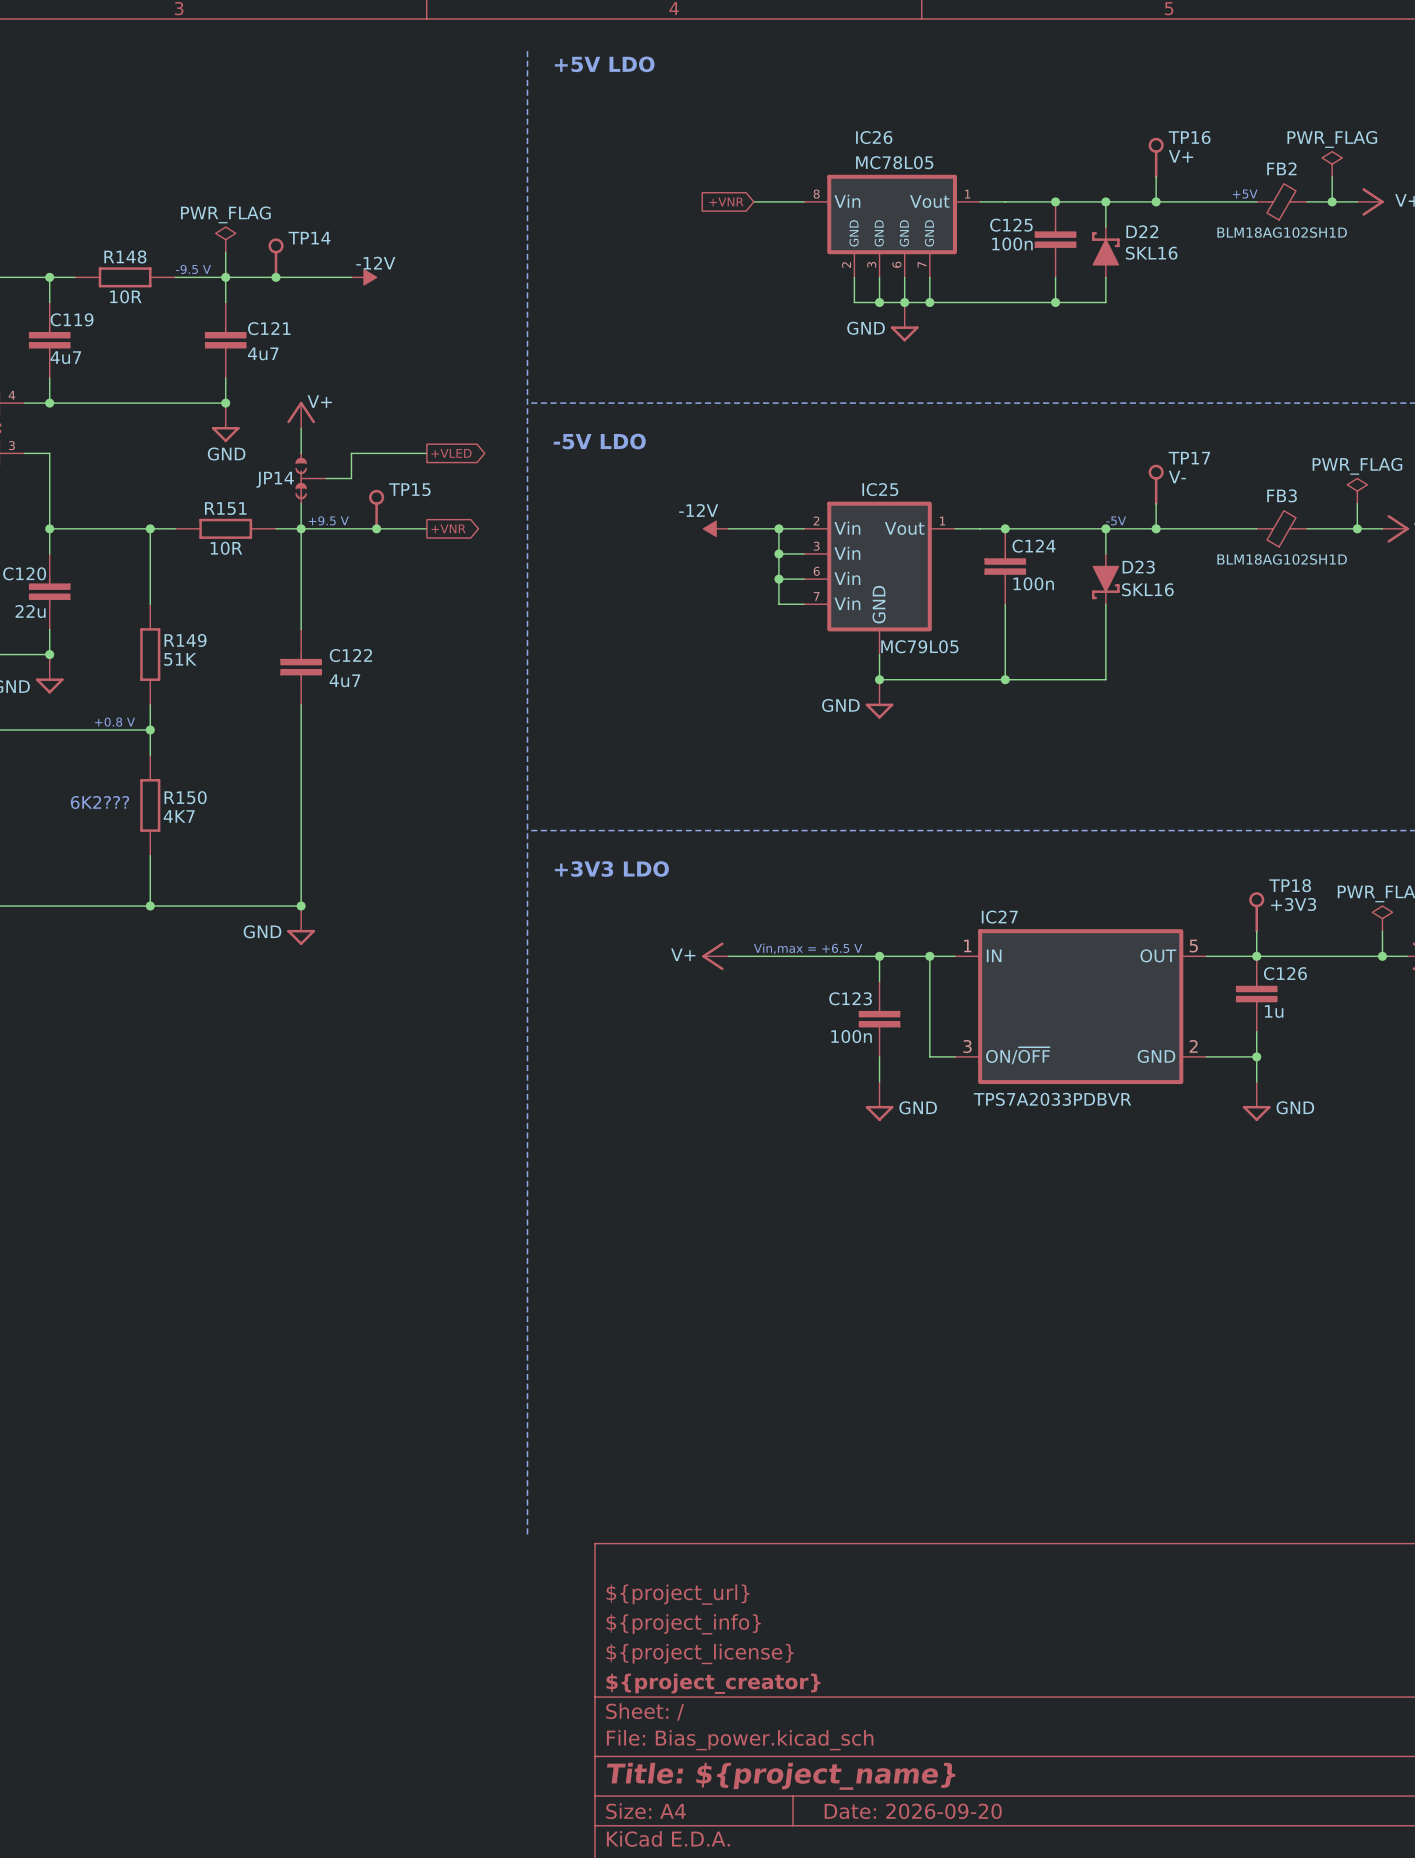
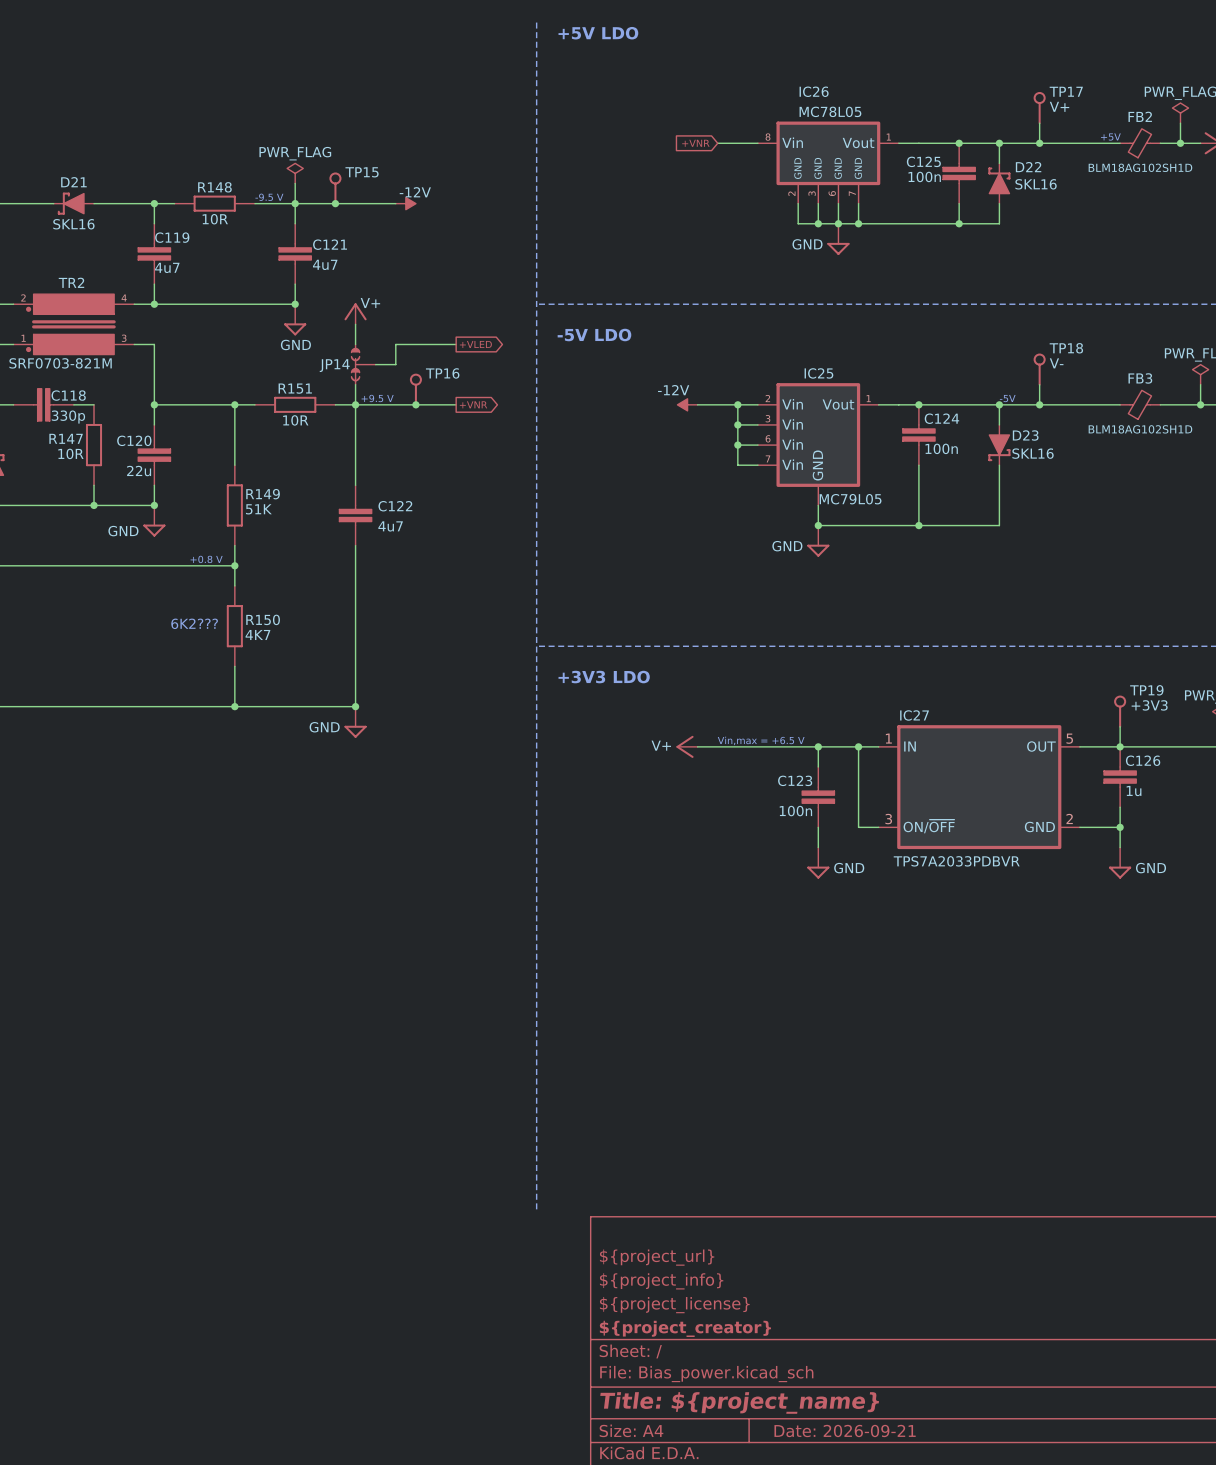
TP16 name: TP16 (1189, 137) -> TP17 (1066, 91)
TP14 name: TP14 (309, 238) -> TP15 (362, 172)
TP17 name: TP17 (1189, 458) -> TP18 (1066, 348)
TP15 name: TP15 (409, 489) -> TP16 (442, 373)
TP18 name: TP18 (1290, 885) -> TP19 (1146, 690)
title block: Date: 2026-09-20 (913, 1811) -> Date: 2026-09-21 (845, 1430)

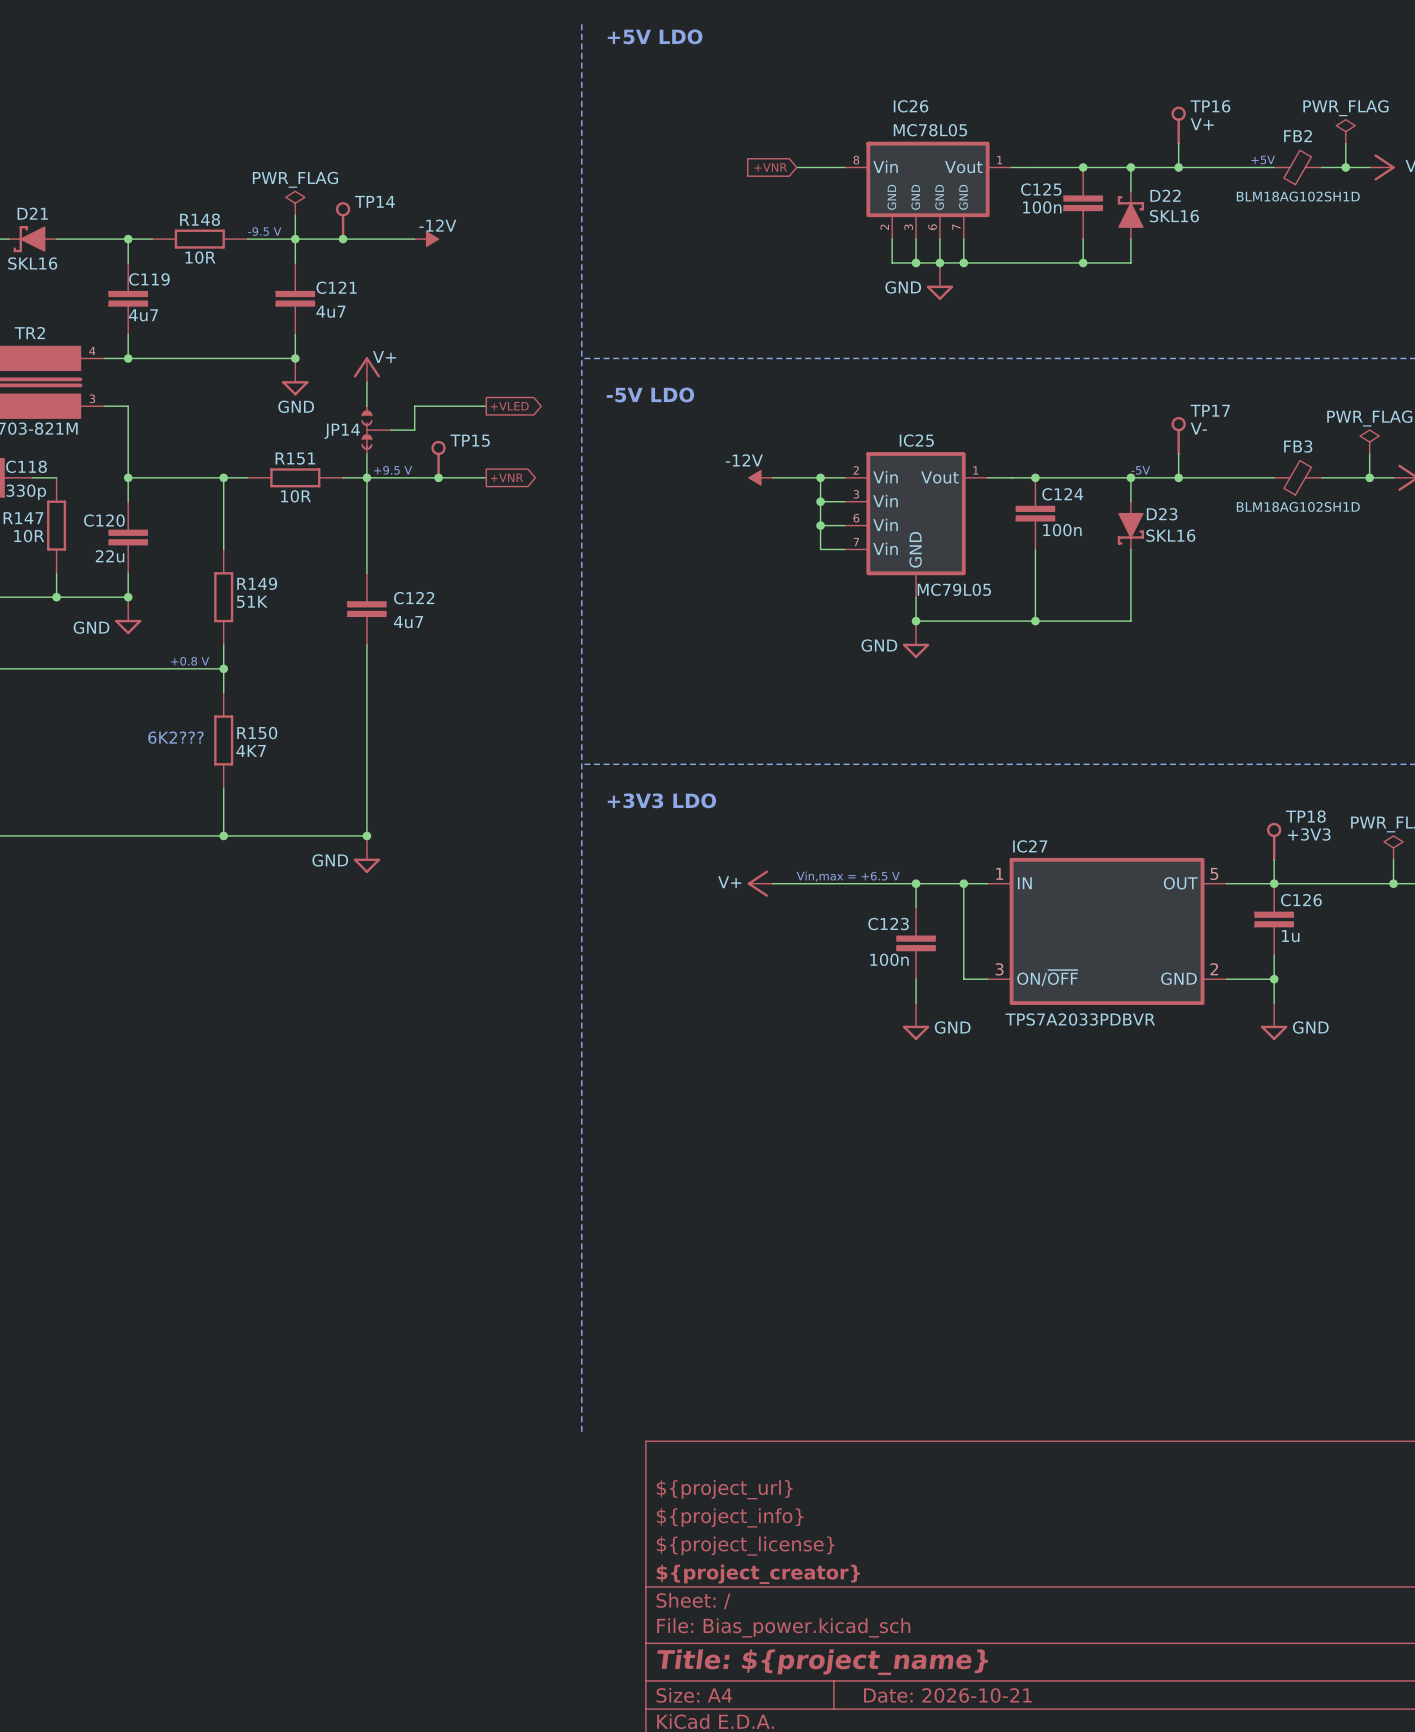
TP17 name: TP17 (1066, 91) -> TP16 (1210, 106)
TP15 name: TP15 (362, 172) -> TP14 (374, 201)
TP18 name: TP18 (1066, 348) -> TP17 (1210, 410)
TP16 name: TP16 (442, 373) -> TP15 (470, 440)
TP19 name: TP19 (1146, 690) -> TP18 (1305, 816)
title block: Date: 2026-09-21 (845, 1430) -> Date: 2026-10-21 (947, 1695)

